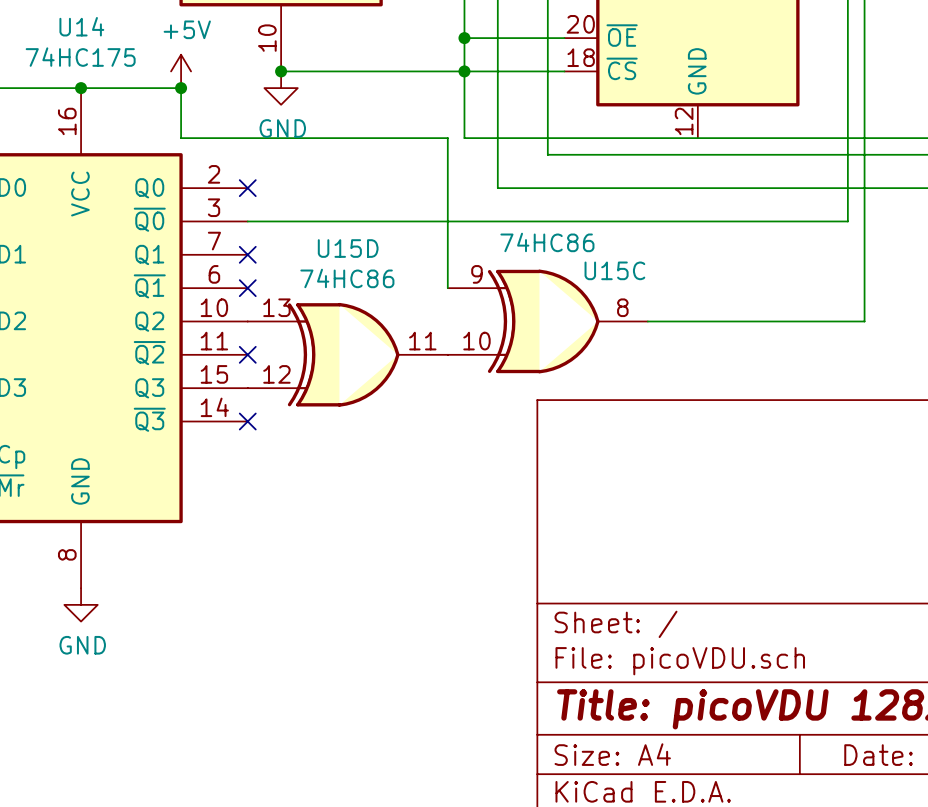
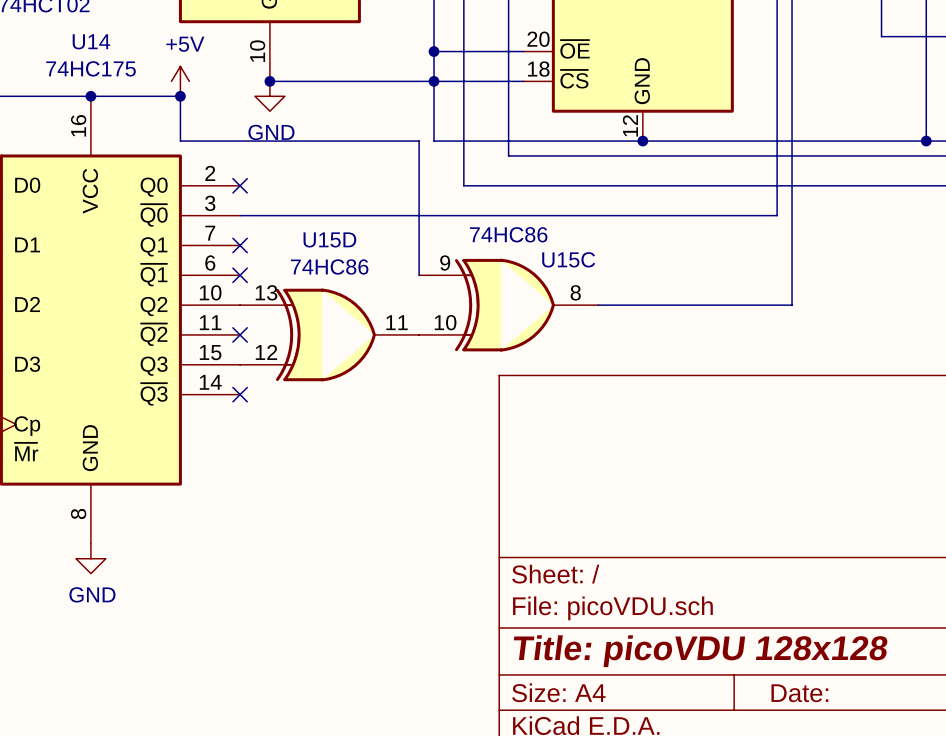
junction: none -> (642, 141)

